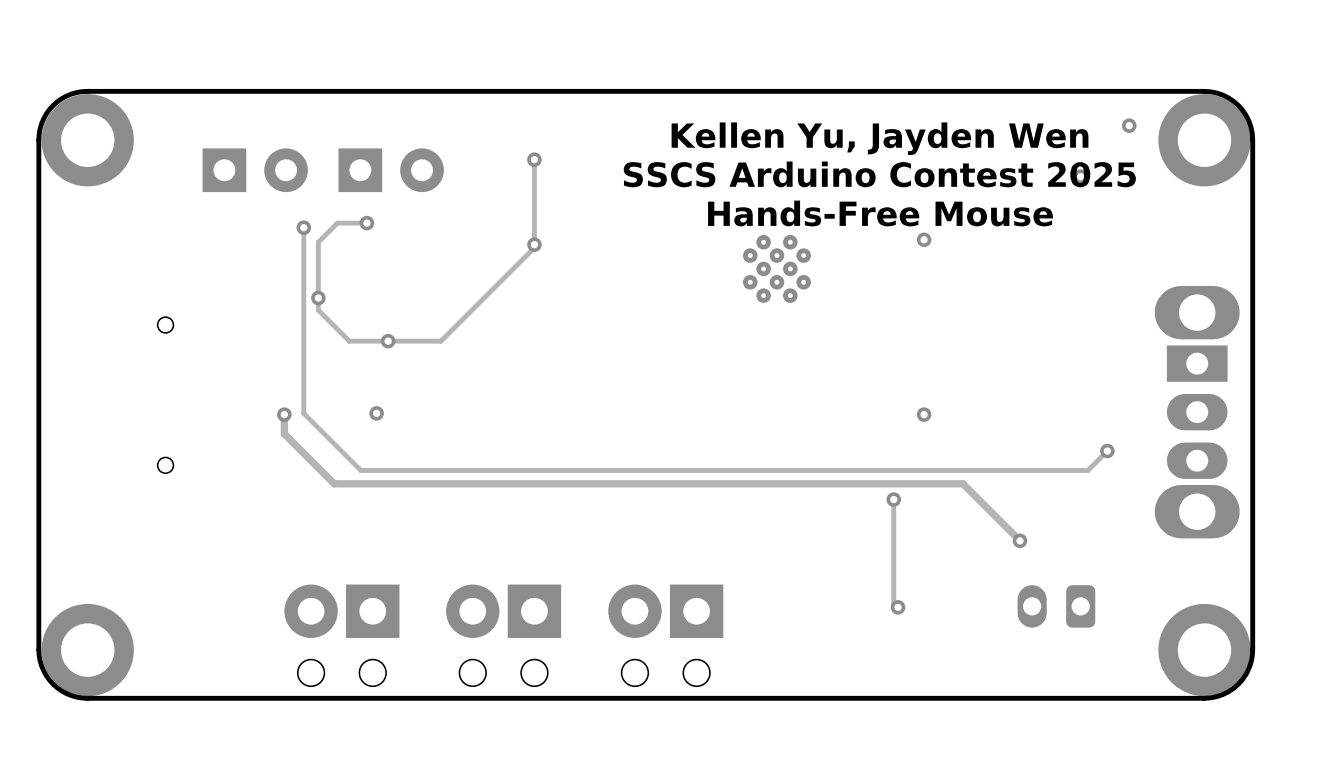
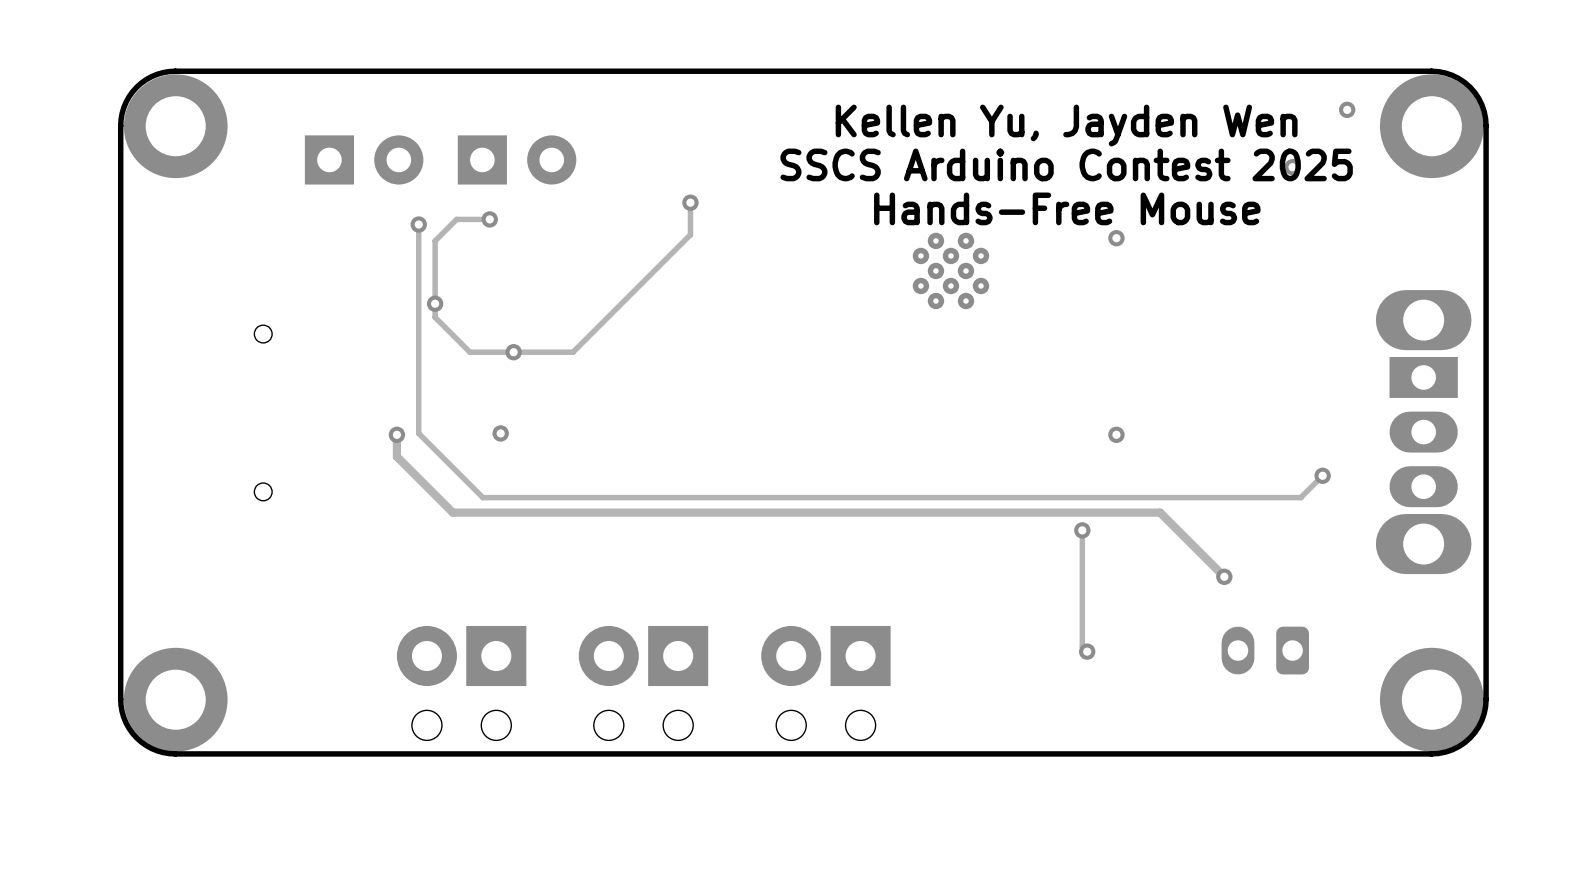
track: (534, 159) (534, 247) -> (690, 202) (690, 234) (678, 247)
via: (534, 159) -> none
via: none -> (690, 202)
via: (534, 244) -> none

